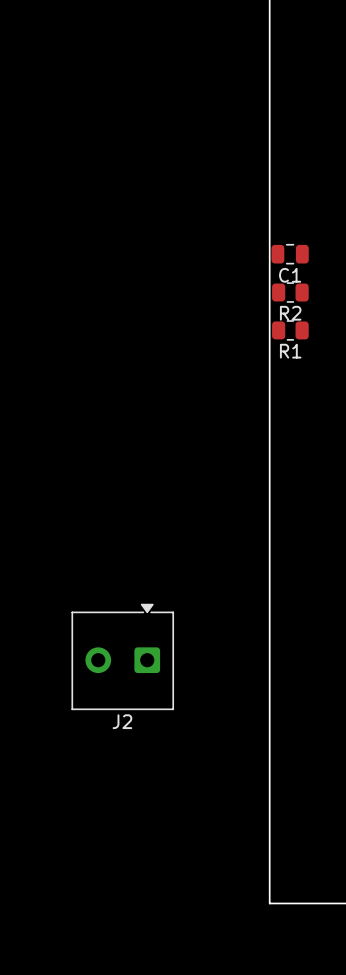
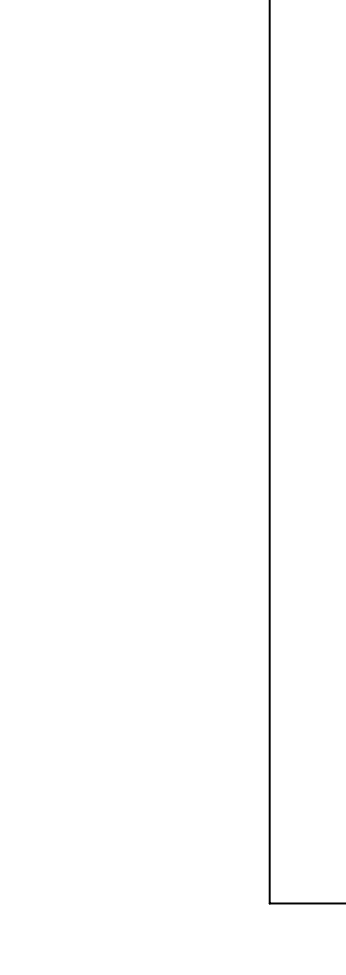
C1: (290, 254) -> none
R2: (290, 292) -> none
R1: (290, 330) -> none
J2: (122, 656) -> none

